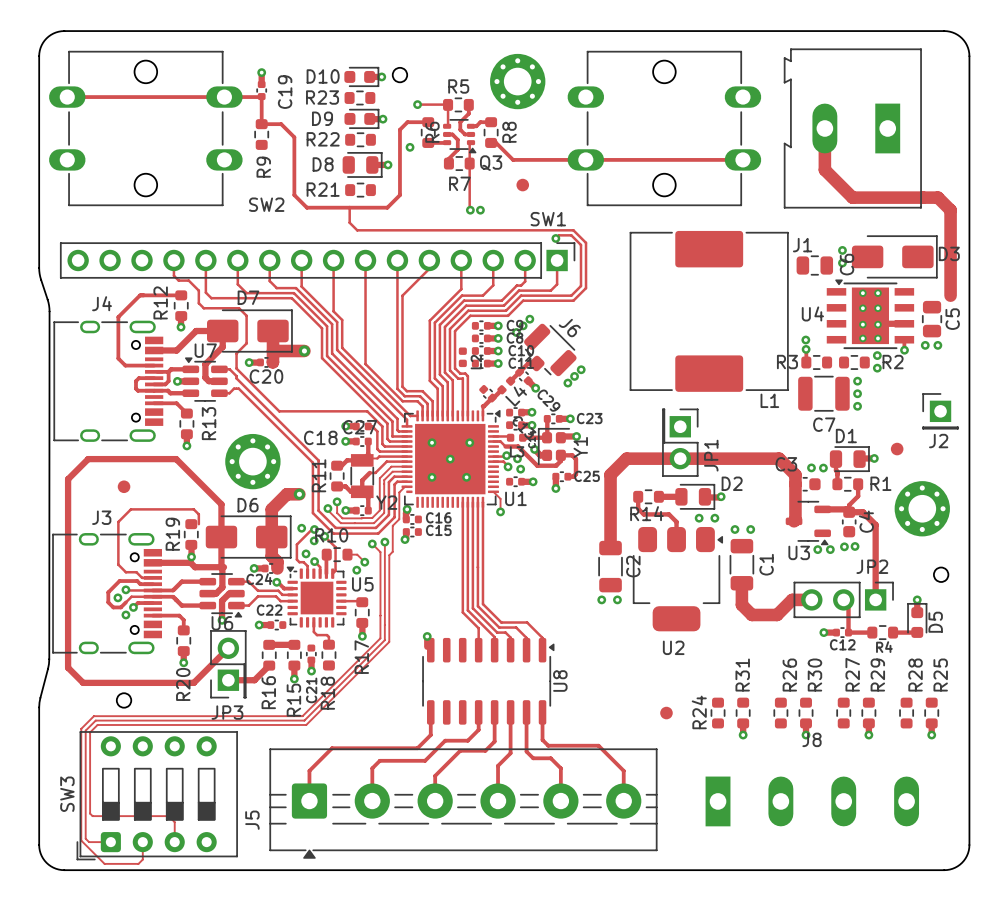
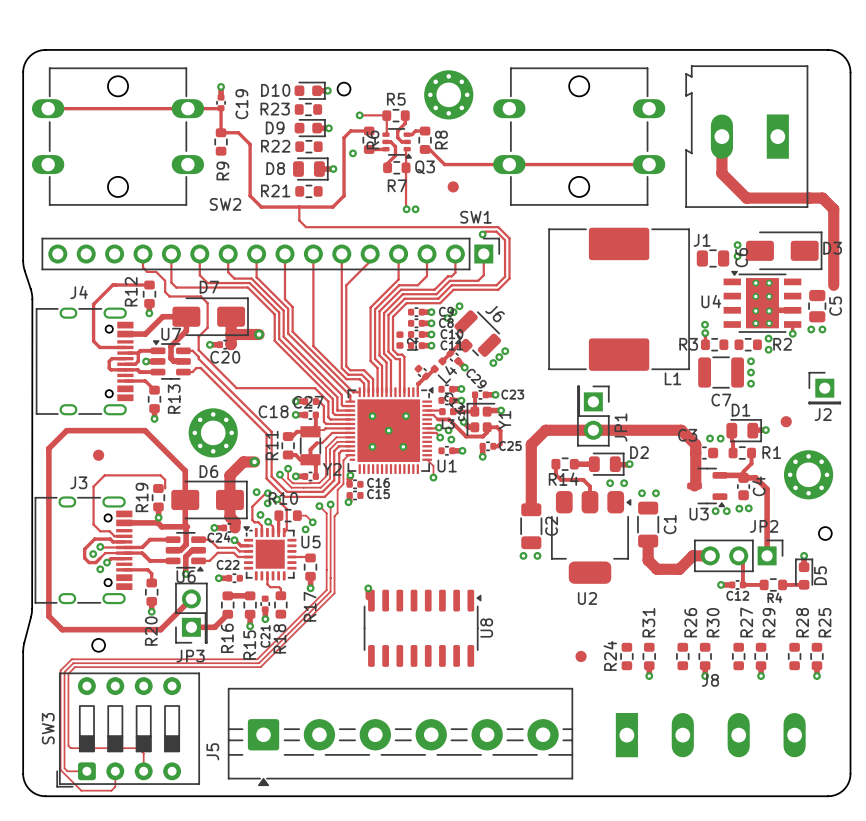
track: (462, 502) (462, 612) (478, 628) (478, 650) -> none
track: (467, 502) (467, 610) (494, 637) (494, 650) -> none
track: (472, 502) (472, 608) (497, 632) (505, 632) (510, 637) (510, 650) -> none
track: (477, 502) (477, 606) (499, 627) (516, 627) (526, 637) (526, 650) -> none
track: (482, 502) (482, 604) (501, 622) (527, 622) (542, 637) (542, 650) -> none
track: (430, 712) (430, 735) (417, 748) (332, 748) (309, 770) (309, 801) -> none
track: (478, 712) (478, 729) (467, 740) (445, 740) (425, 760) (379, 760) (372, 768) (372, 801) -> none
track: (494, 712) (494, 741) (485, 750) (460, 750) (435, 775) (435, 801) -> none
track: (510, 712) (510, 753) (498, 765) (498, 801) -> none
track: (526, 712) (526, 751) (533, 758) (550, 758) (560, 768) (560, 801) -> none
track: (542, 712) (542, 739) (548, 745) (598, 745) (623, 770) (623, 801) -> none

